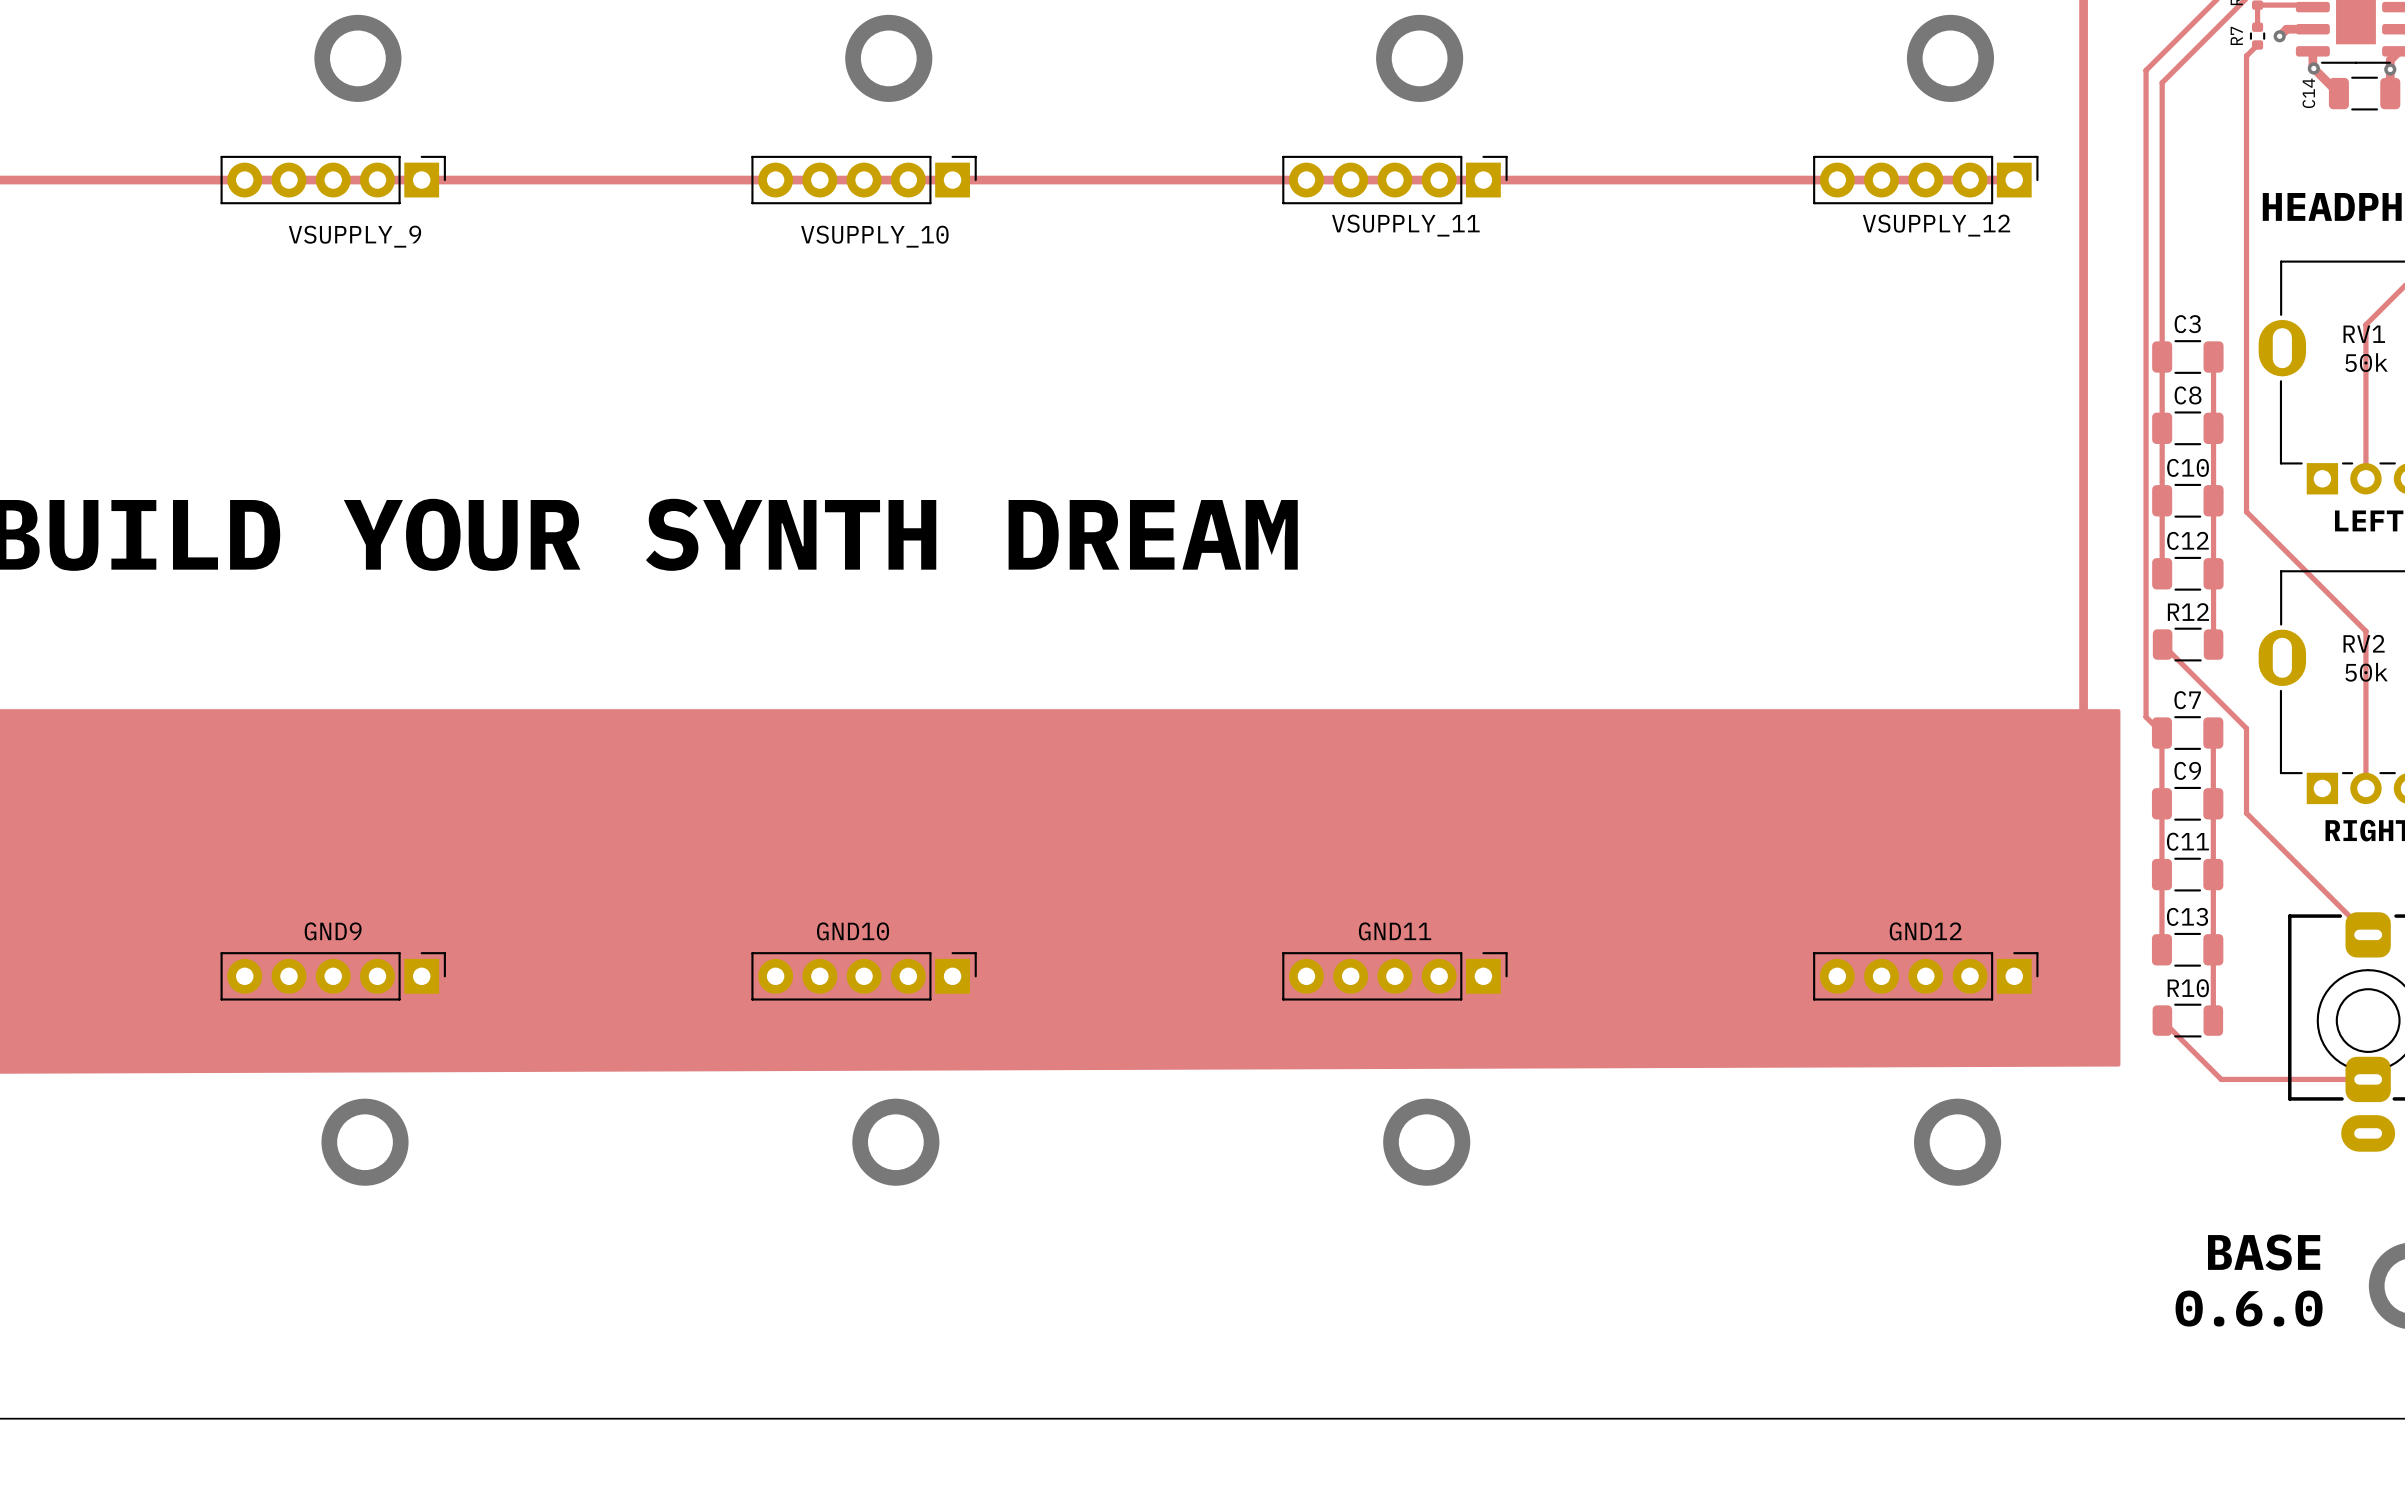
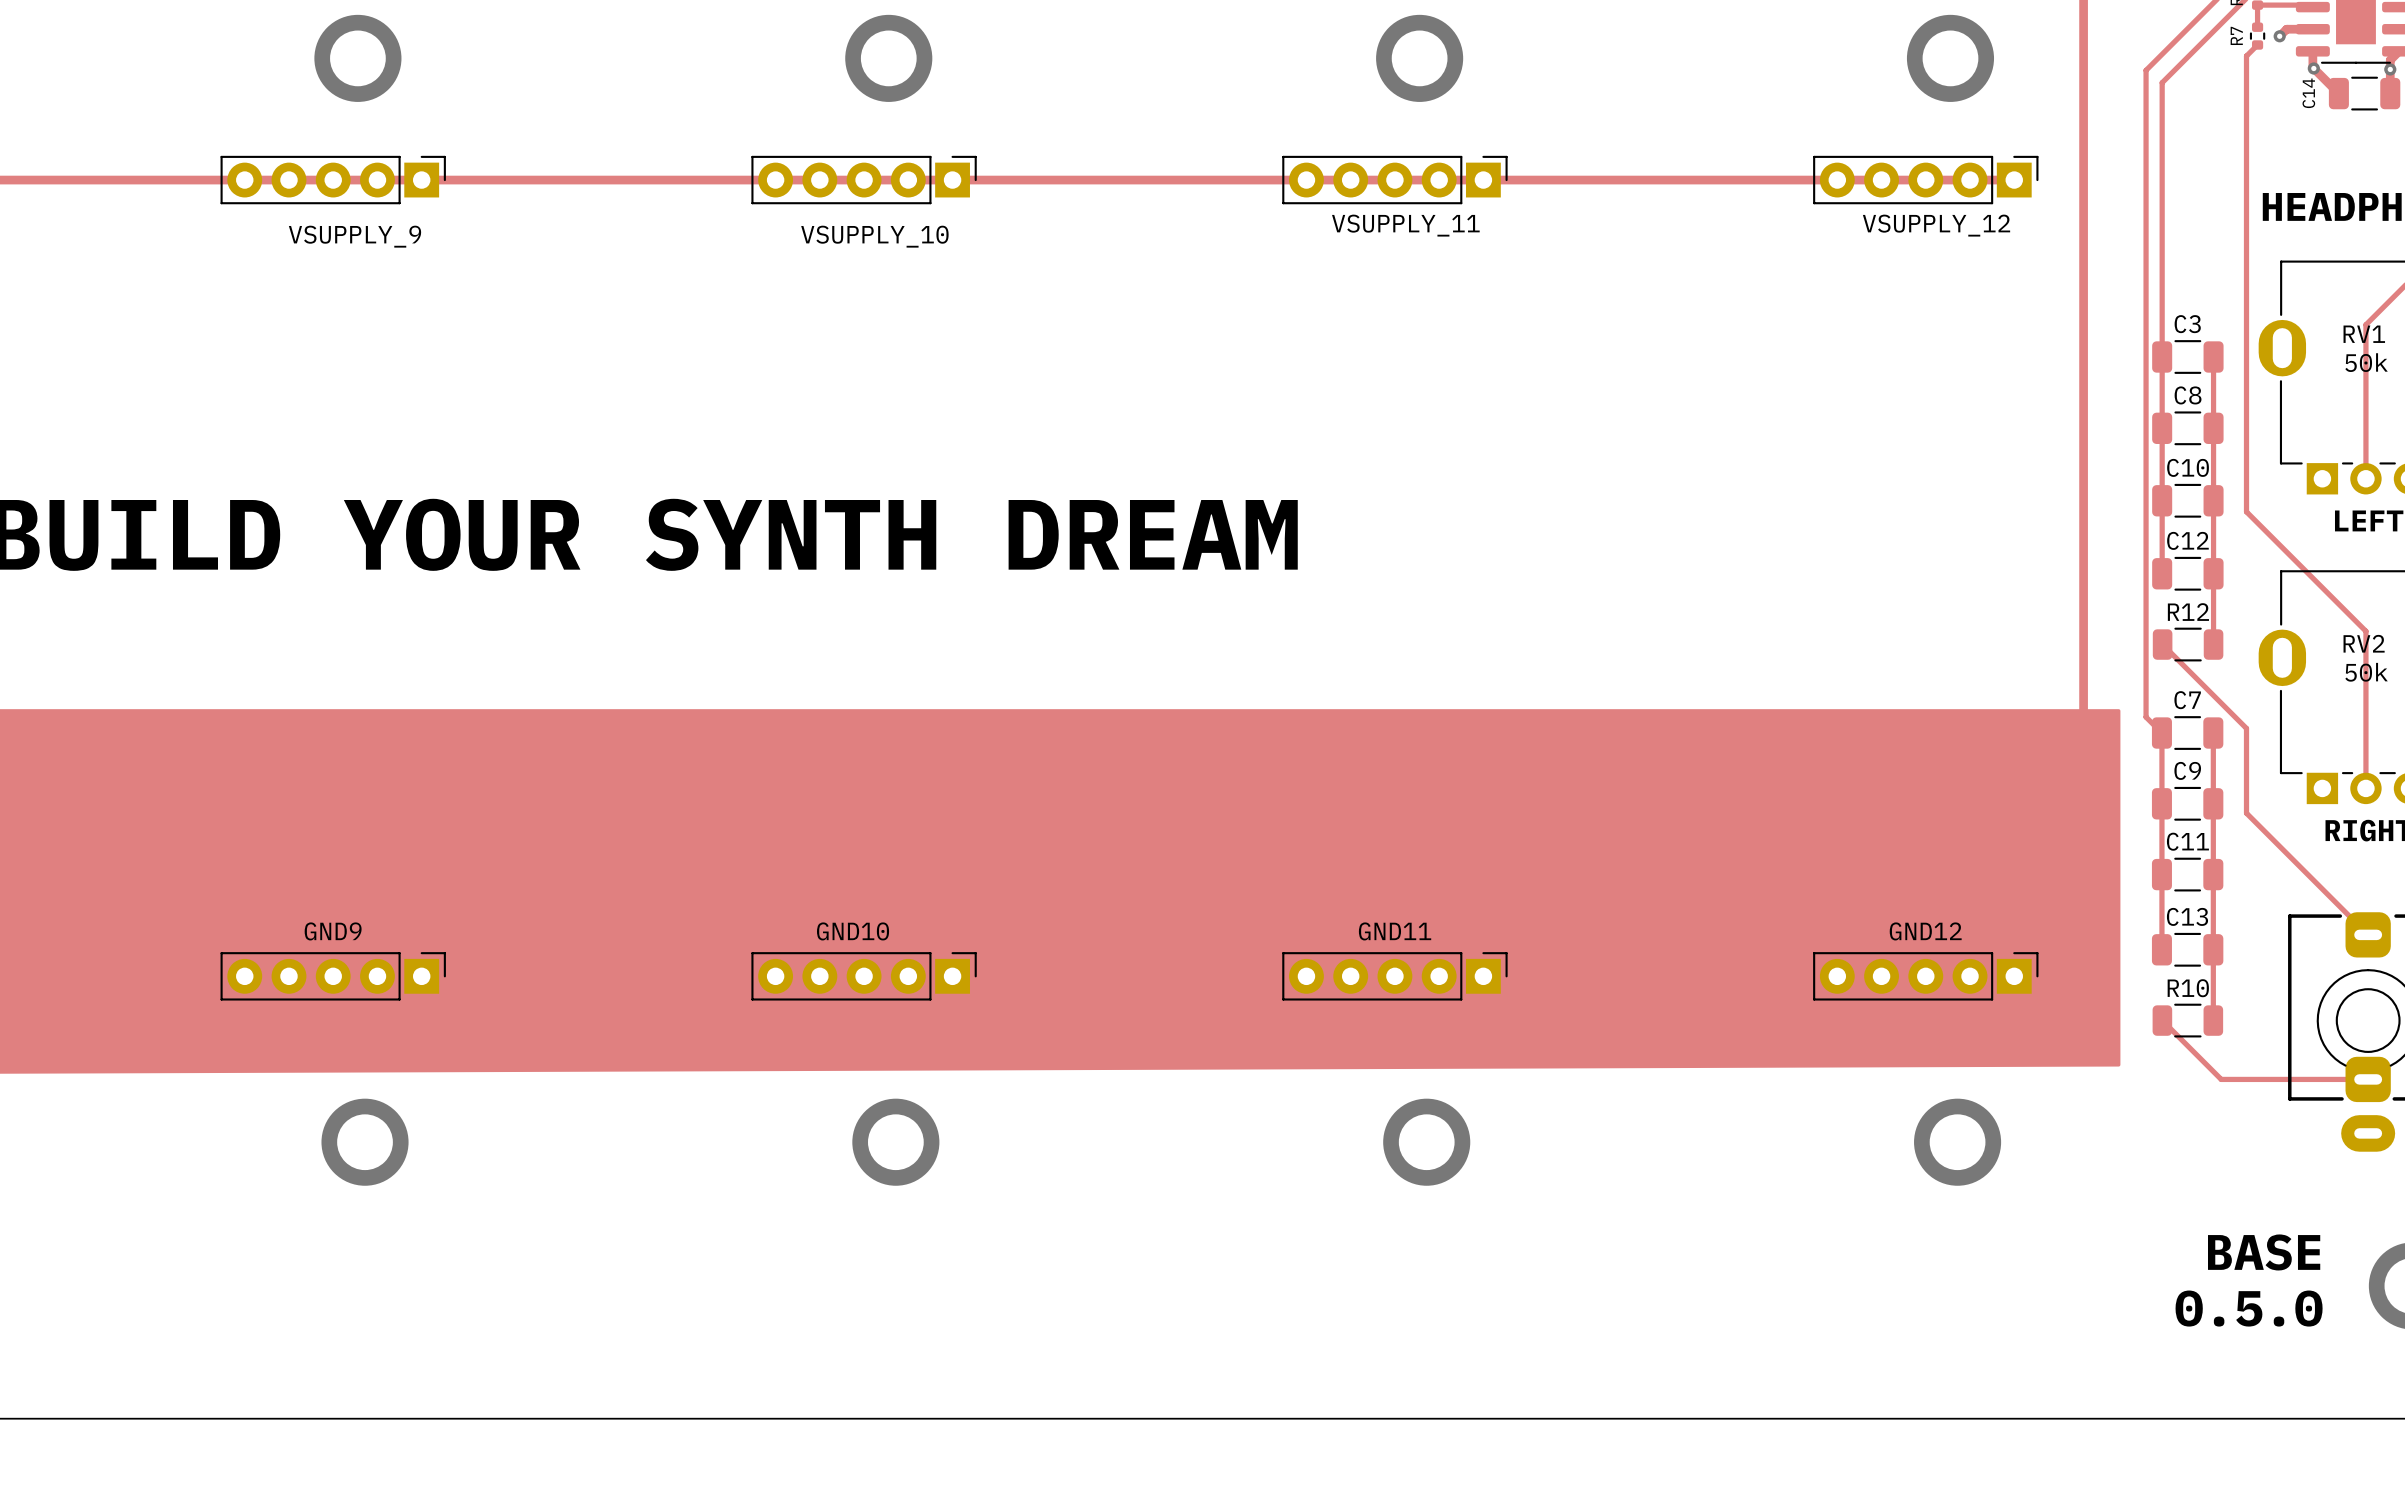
text: 0.6.0 (2249, 1308) -> 0.5.0 (2249, 1308)

